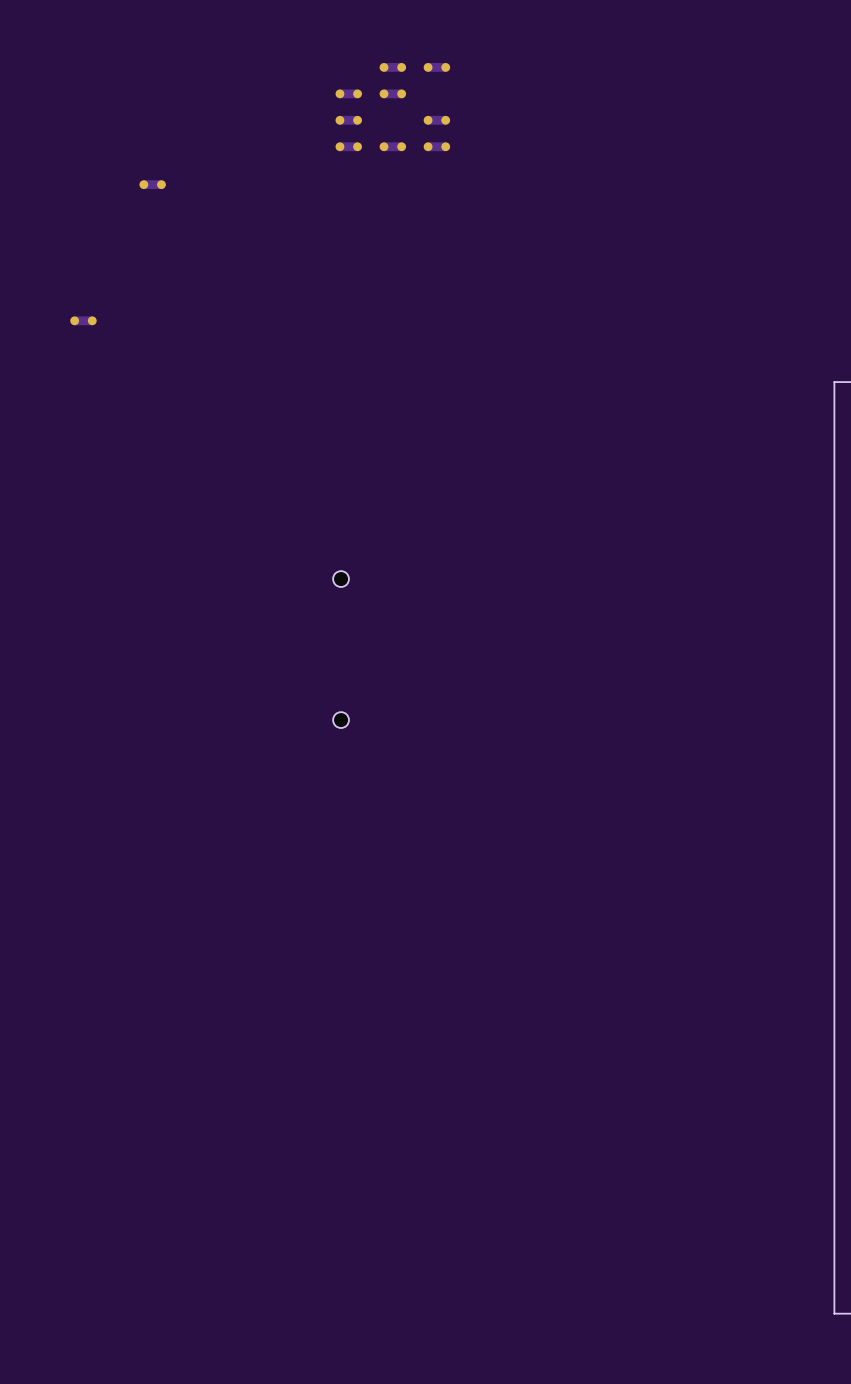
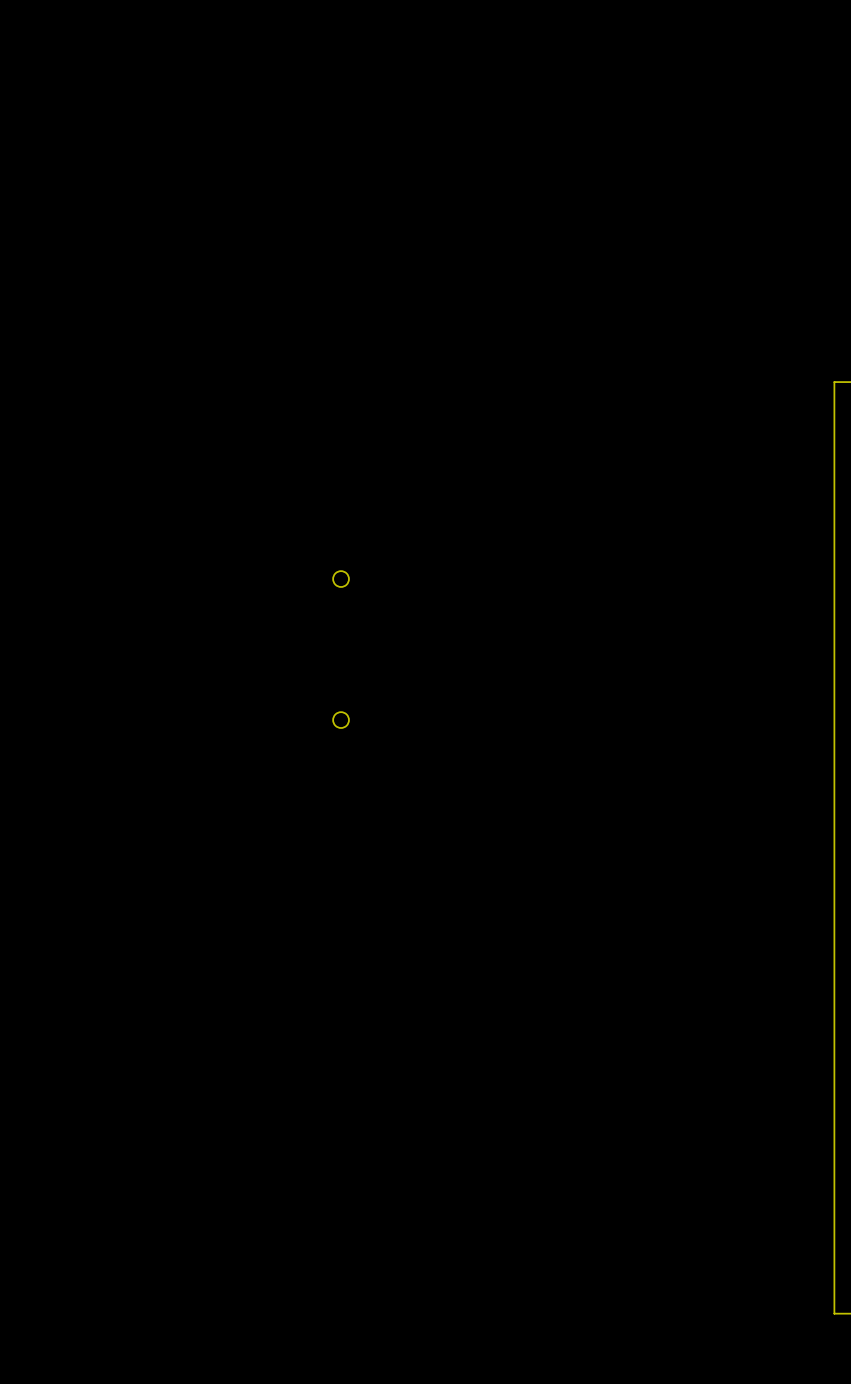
part: (392, 67) -> none
part: (436, 67) -> none
part: (348, 93) -> none
part: (392, 93) -> none
part: (348, 120) -> none
part: (436, 120) -> none
part: (348, 146) -> none
part: (392, 146) -> none
part: (436, 146) -> none
part: (152, 184) -> none
part: (83, 320) -> none

